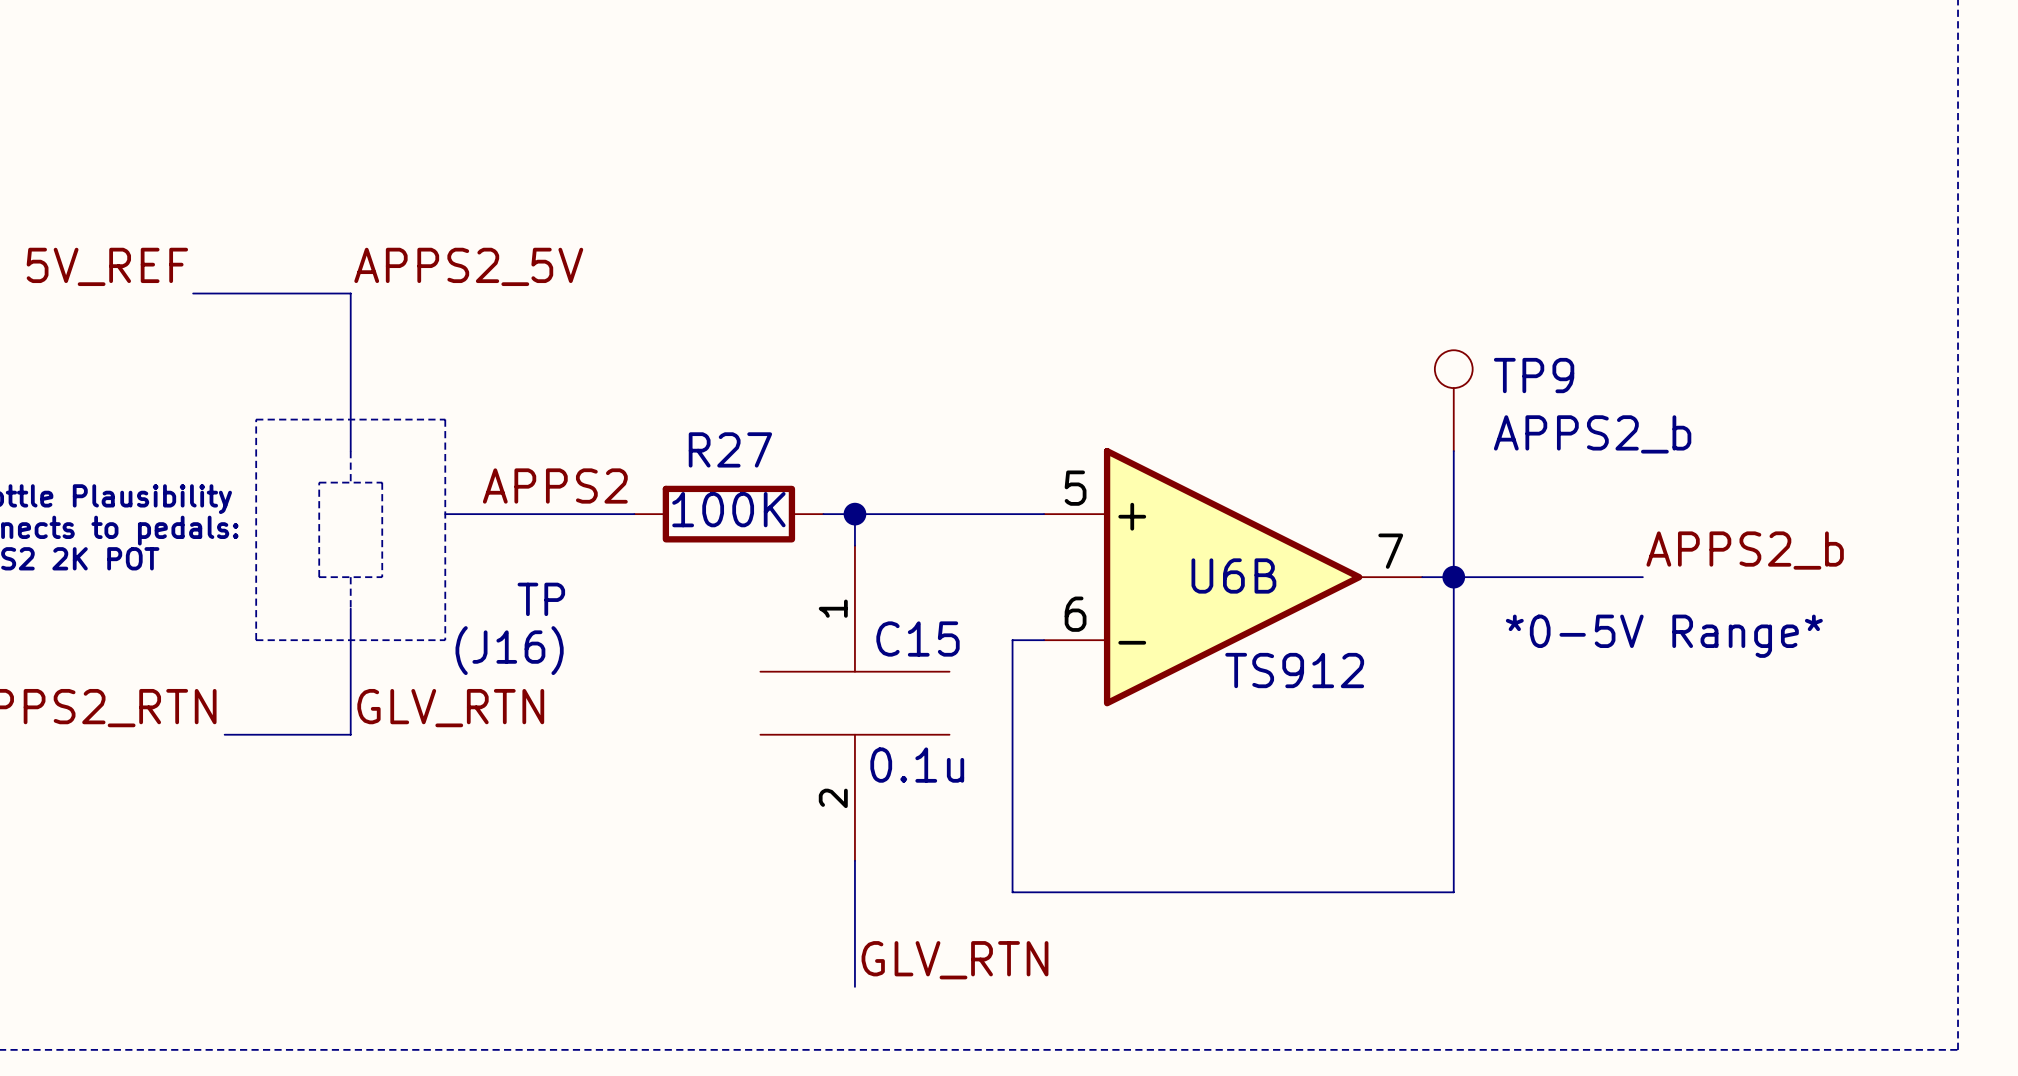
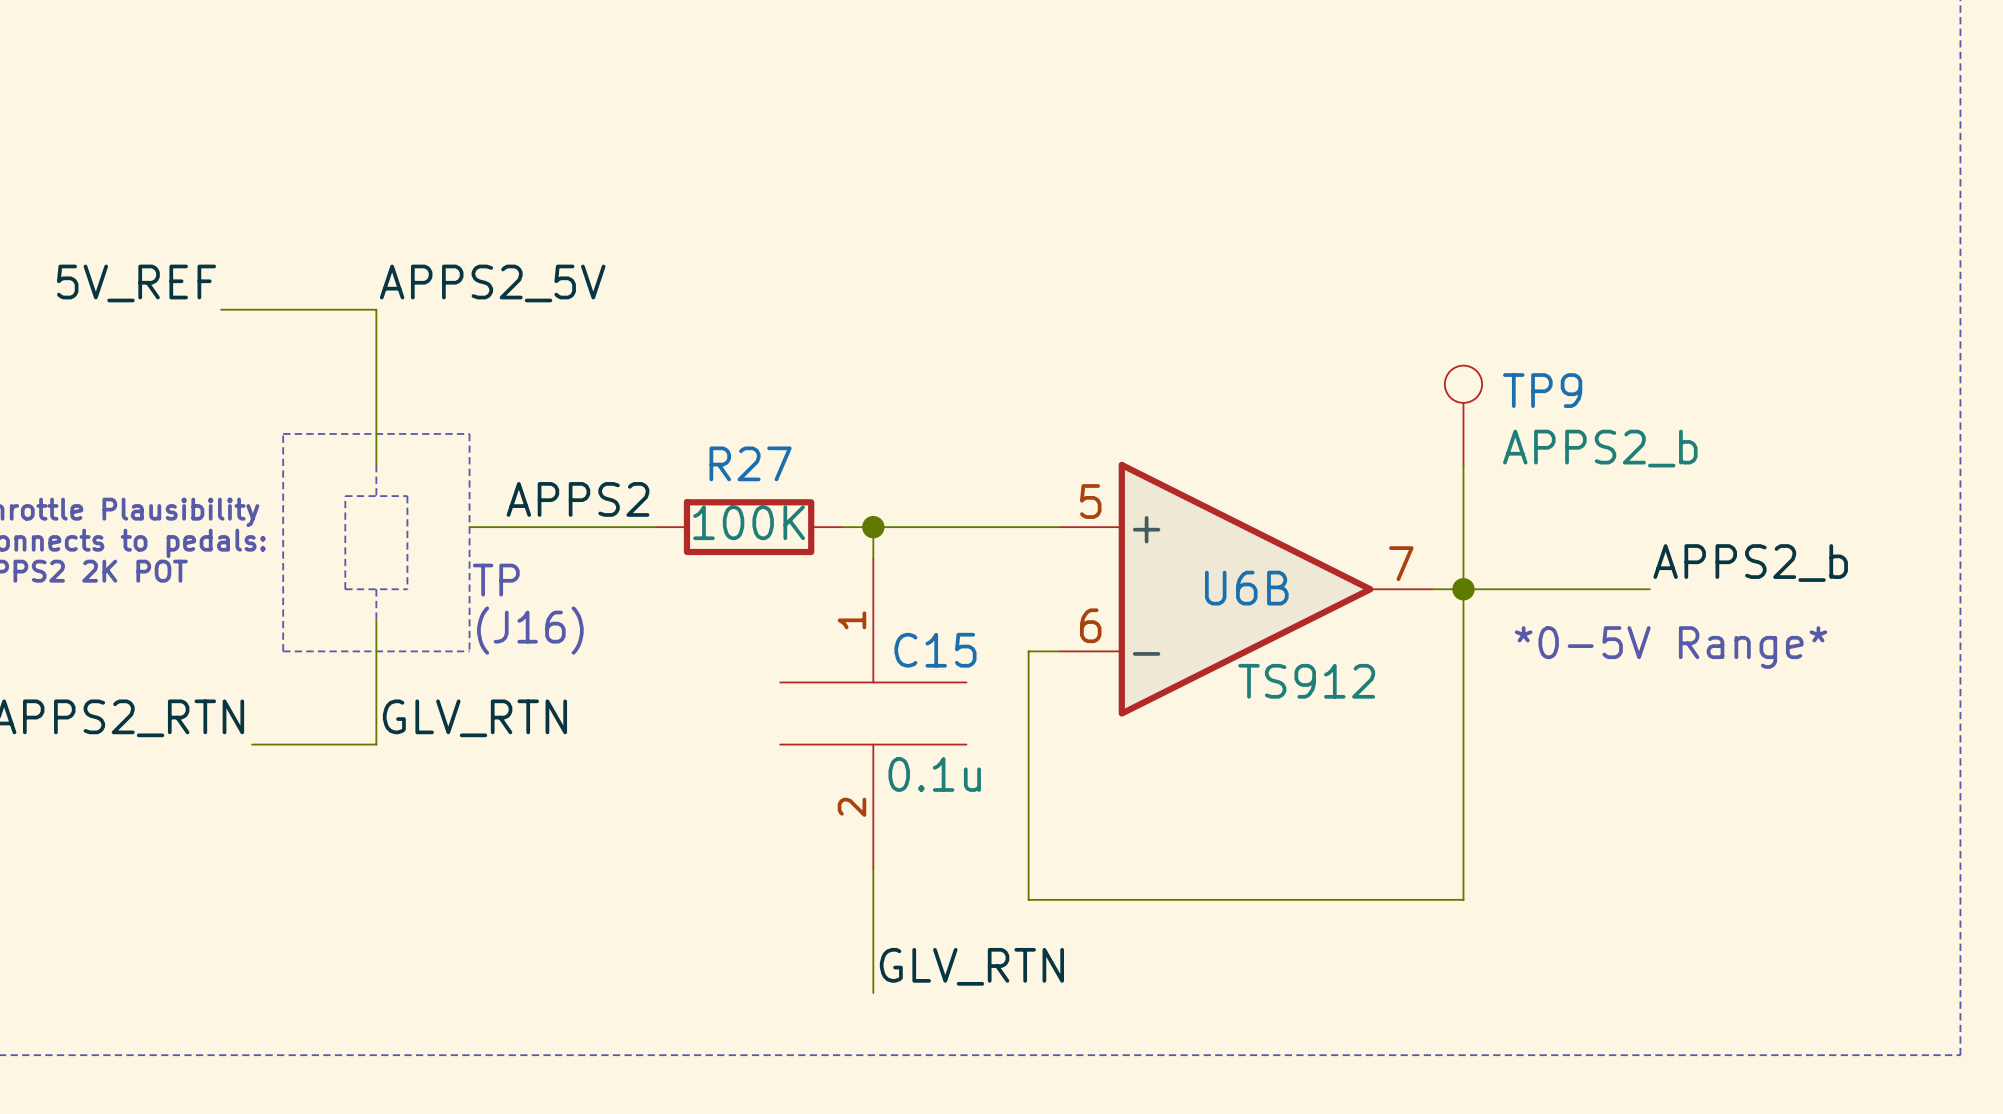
text position: TP (541, 599) -> TP (496, 580)
text position: (J16) (509, 650) -> (J16) (530, 630)

